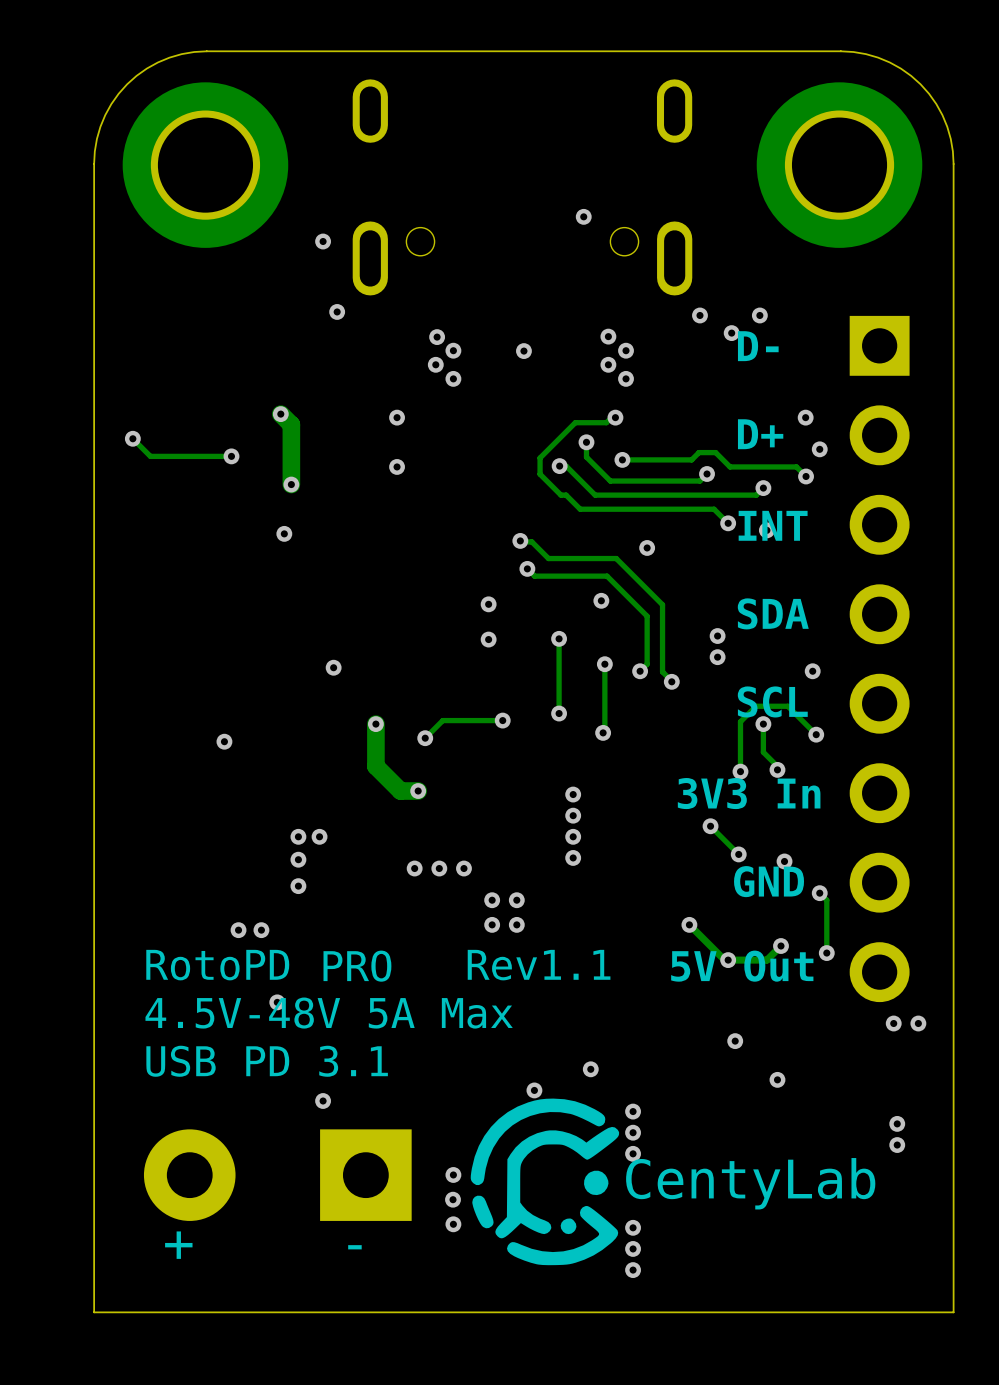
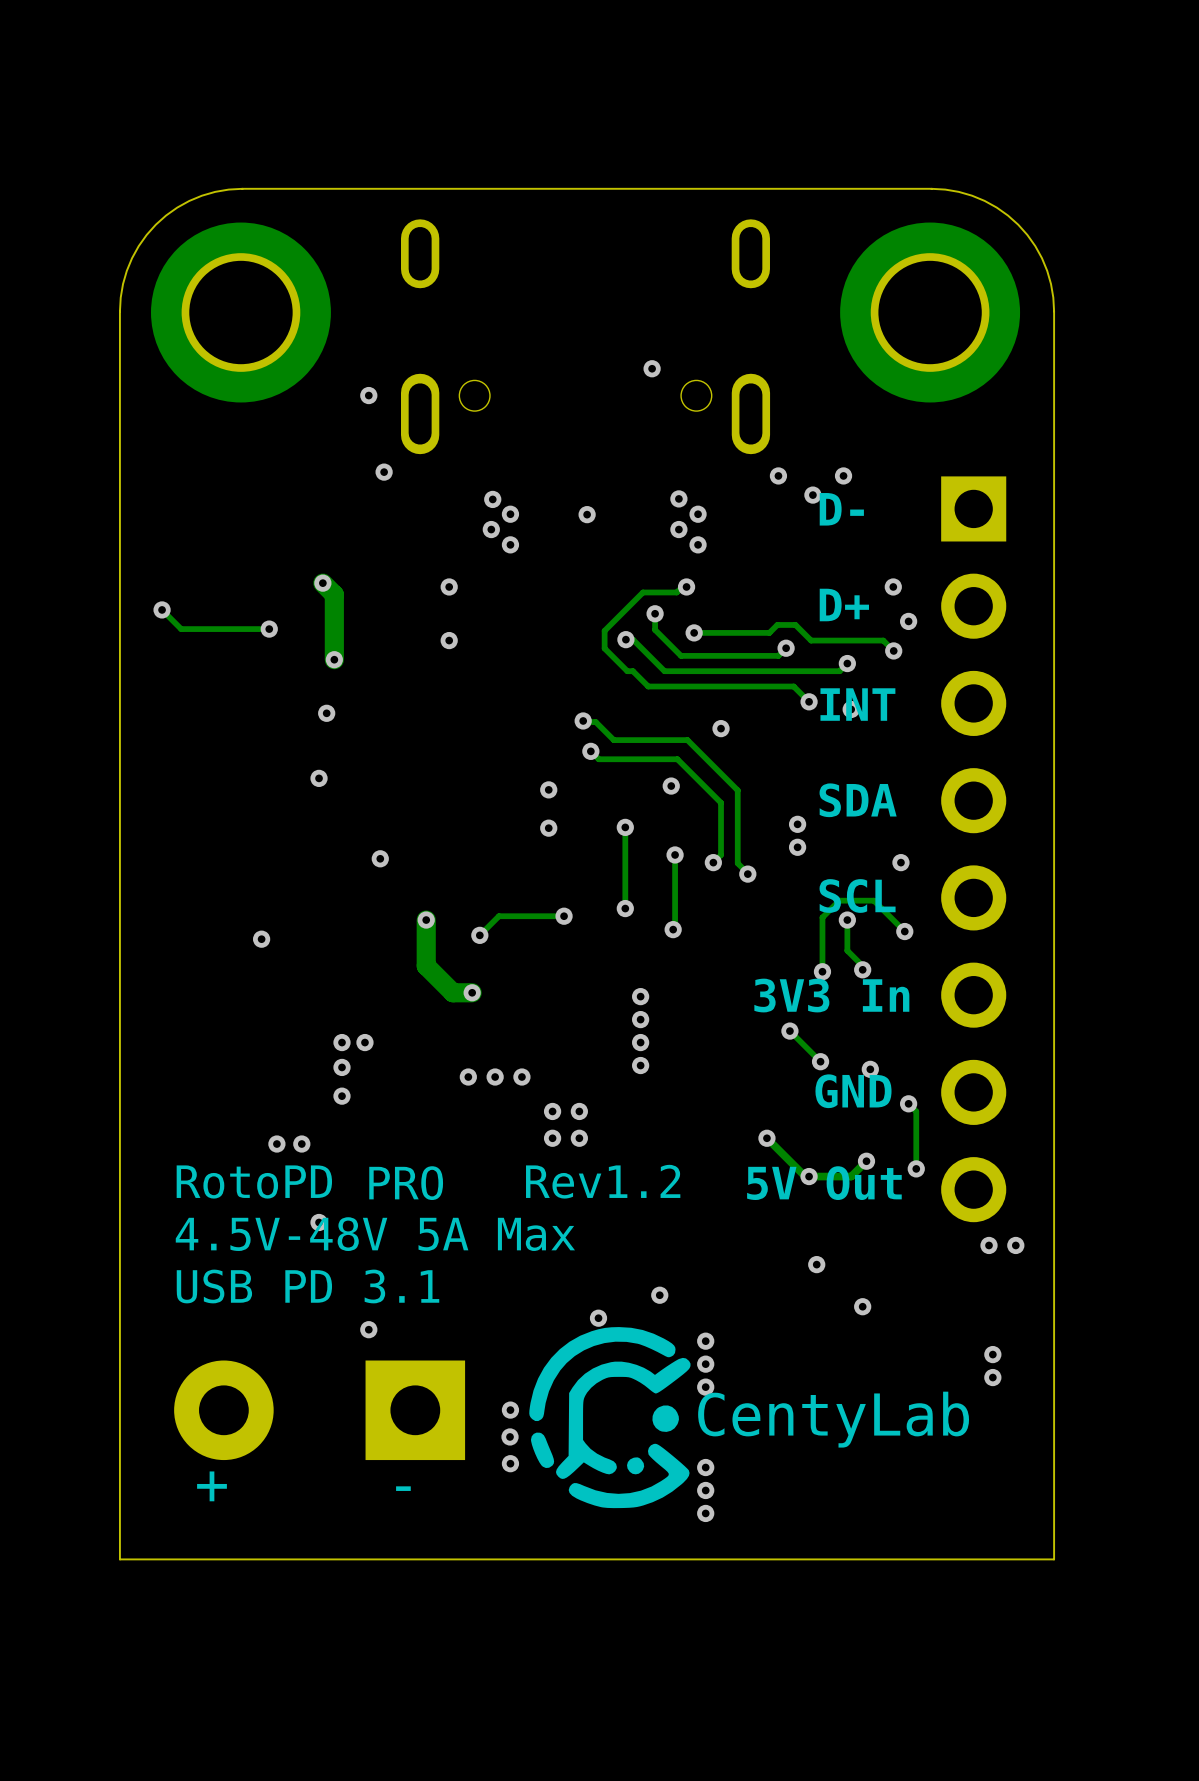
via: none -> (319, 778)
text: RotoPD Rev1.1 (378, 965) -> RotoPD Rev1.2 (428, 1181)

